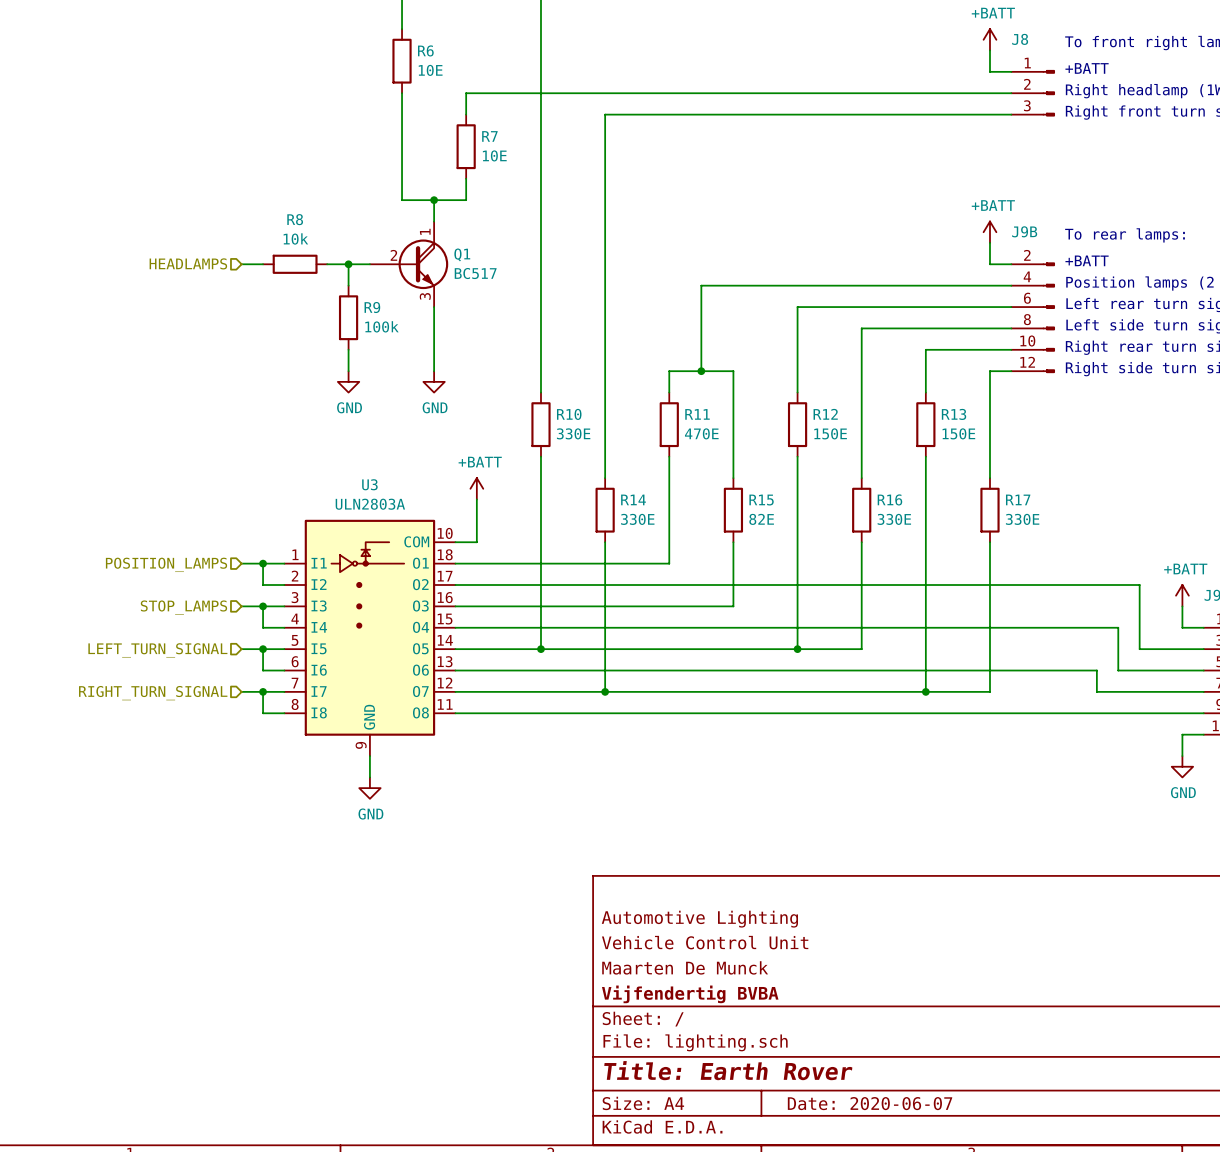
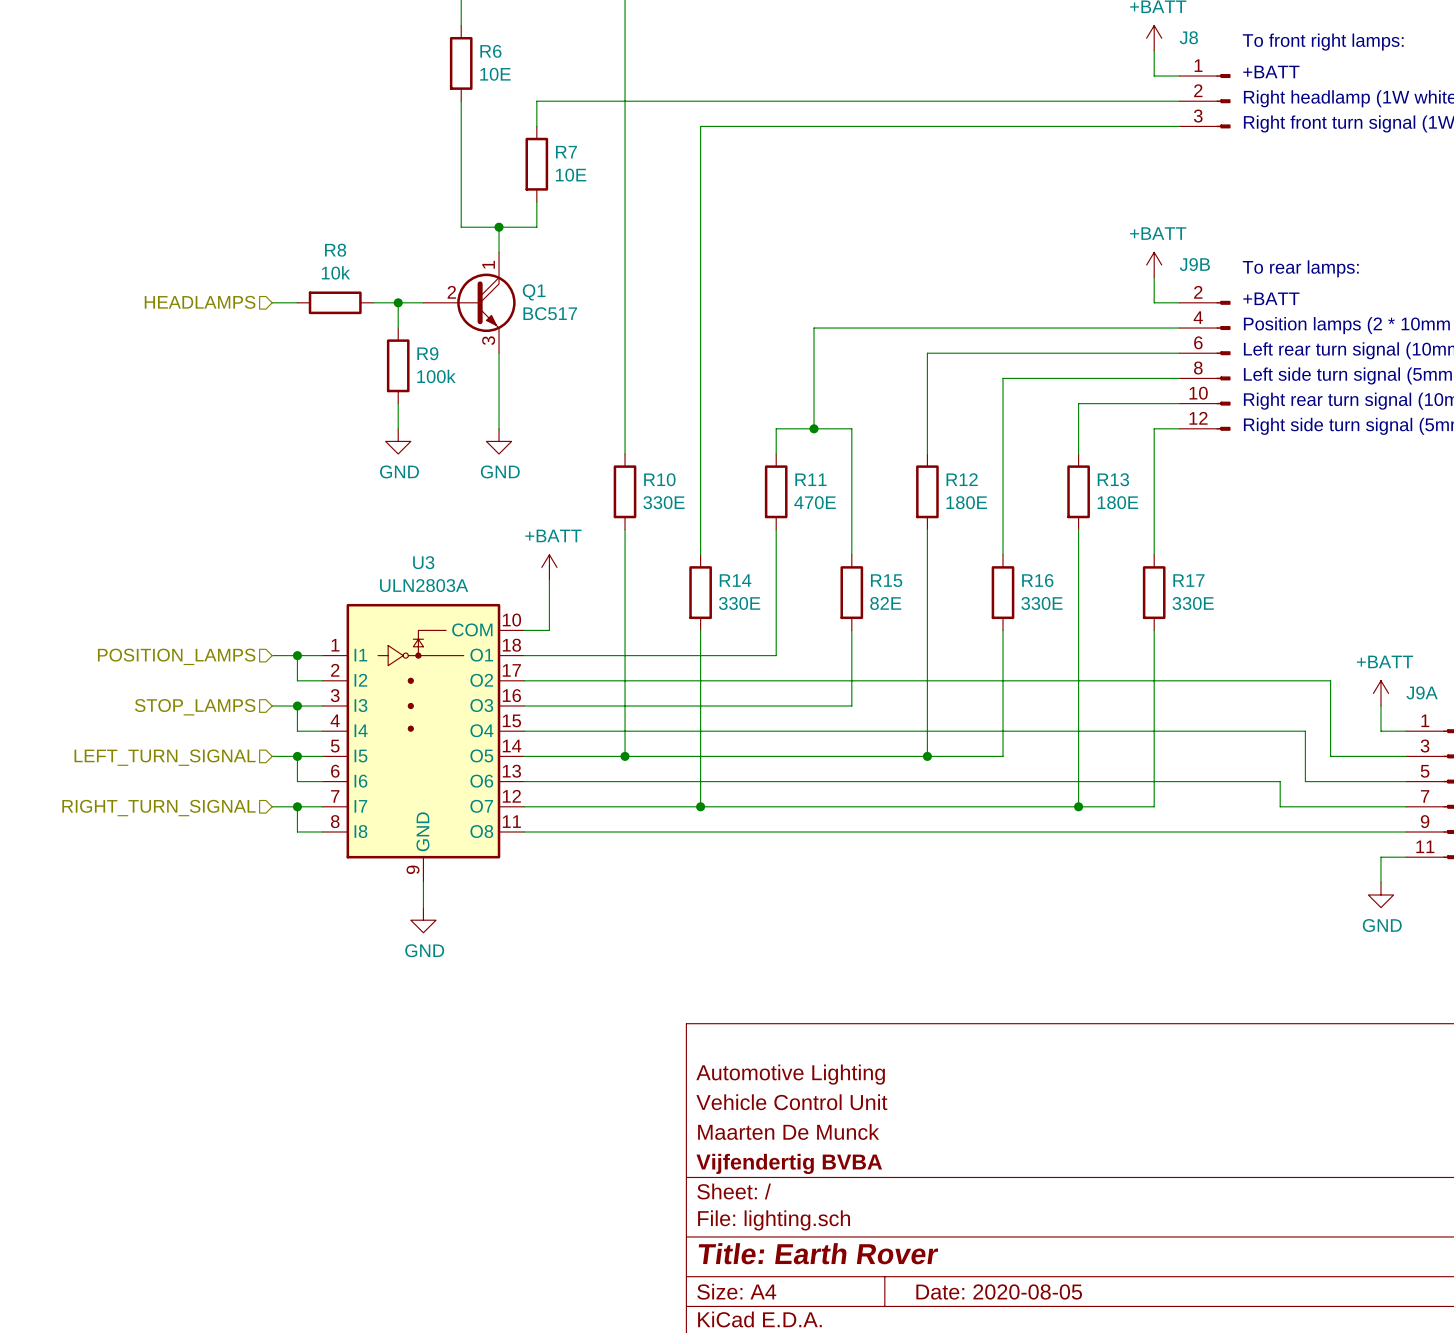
R12 value: 150E (830, 433) -> 180E (966, 502)
R13 value: 150E (958, 433) -> 180E (1117, 502)
title block: Date: 2020-06-07 (870, 1103) -> Date: 2020-08-05 (999, 1291)

